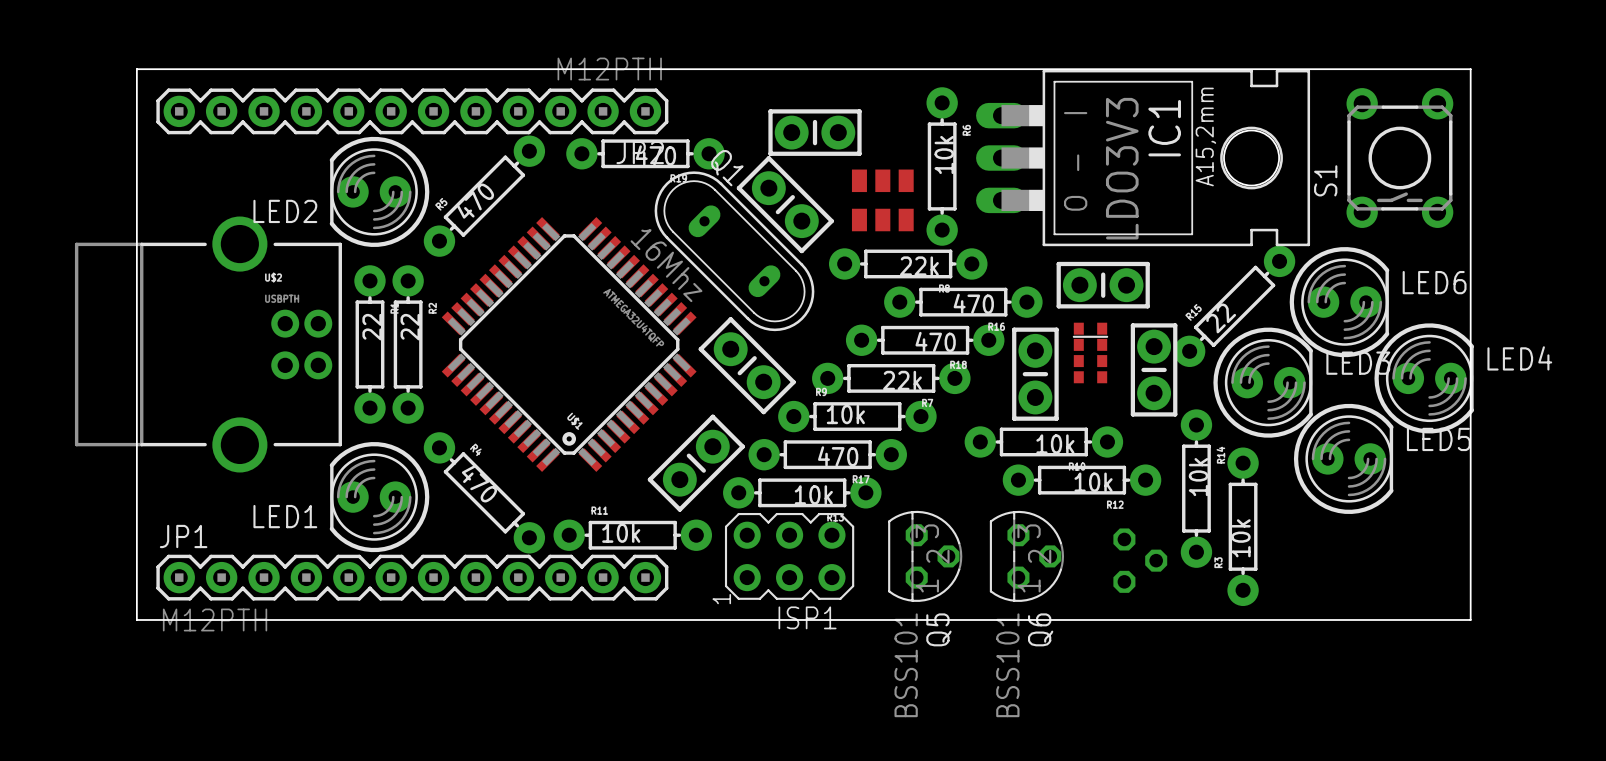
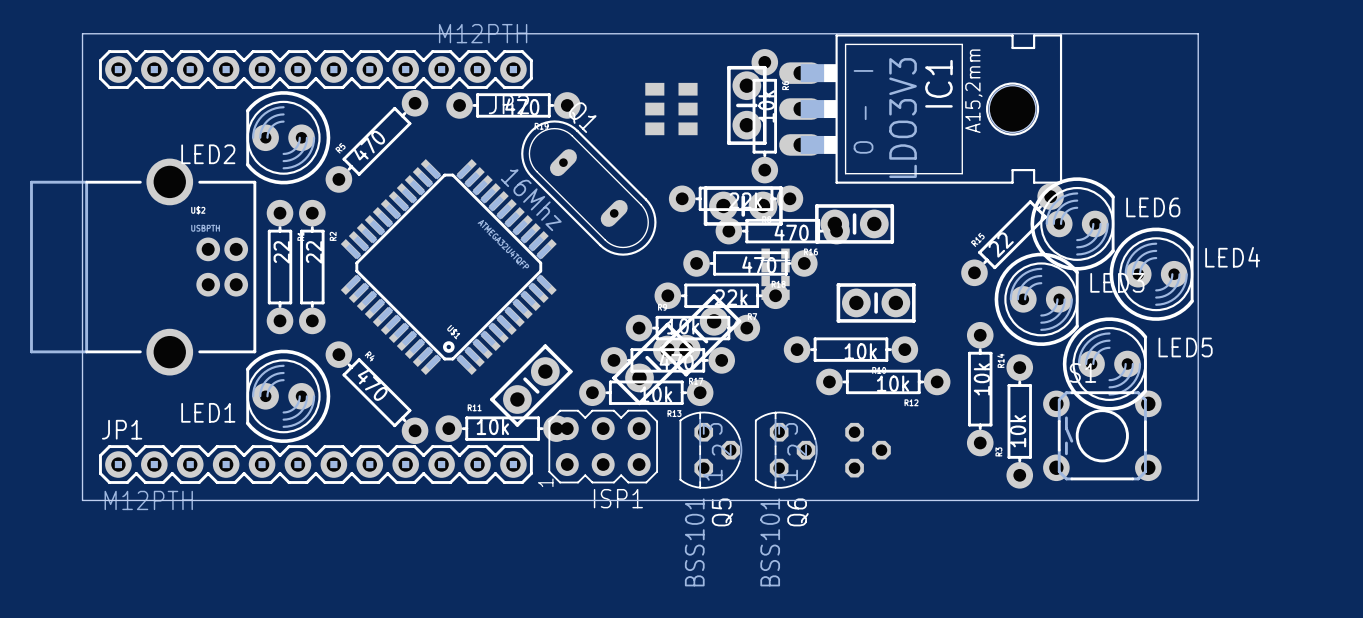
board edge: (1453, 69) (1470, 69) (1470, 619) (1453, 619) -> (1198, 33) (1198, 500)
part: (815, 132) -> none
part: none -> (746, 105)
IC1 position: (1143, 158) -> (920, 109)
S1 rotation: 0° (1399, 158) -> 90° clockwise (1102, 435)
S1 position: (1399, 158) -> (1102, 435)
part rotation: 0° (882, 200) -> 90° clockwise (671, 109)
part position: (882, 200) -> (671, 109)
part: (785, 204) -> none
part: none -> (743, 205)
part: (1103, 285) -> none
part: none -> (854, 223)
LED6 position: (1339, 302) -> (1072, 223)
part position: (1090, 352) -> (775, 274)
part: (747, 365) -> none
part: (1154, 369) -> none
part rotation: 0° (1035, 374) -> 90° clockwise (876, 302)
LED4 position: (1424, 378) -> (1151, 274)
part: none -> (700, 335)
part: none -> (653, 363)
part position: (696, 463) -> (531, 385)
ISP1 position: (789, 556) -> (603, 446)
Q5 position: (925, 556) -> (710, 450)
Q6 position: (1026, 556) -> (786, 450)
part position: (1140, 560) -> (868, 450)

